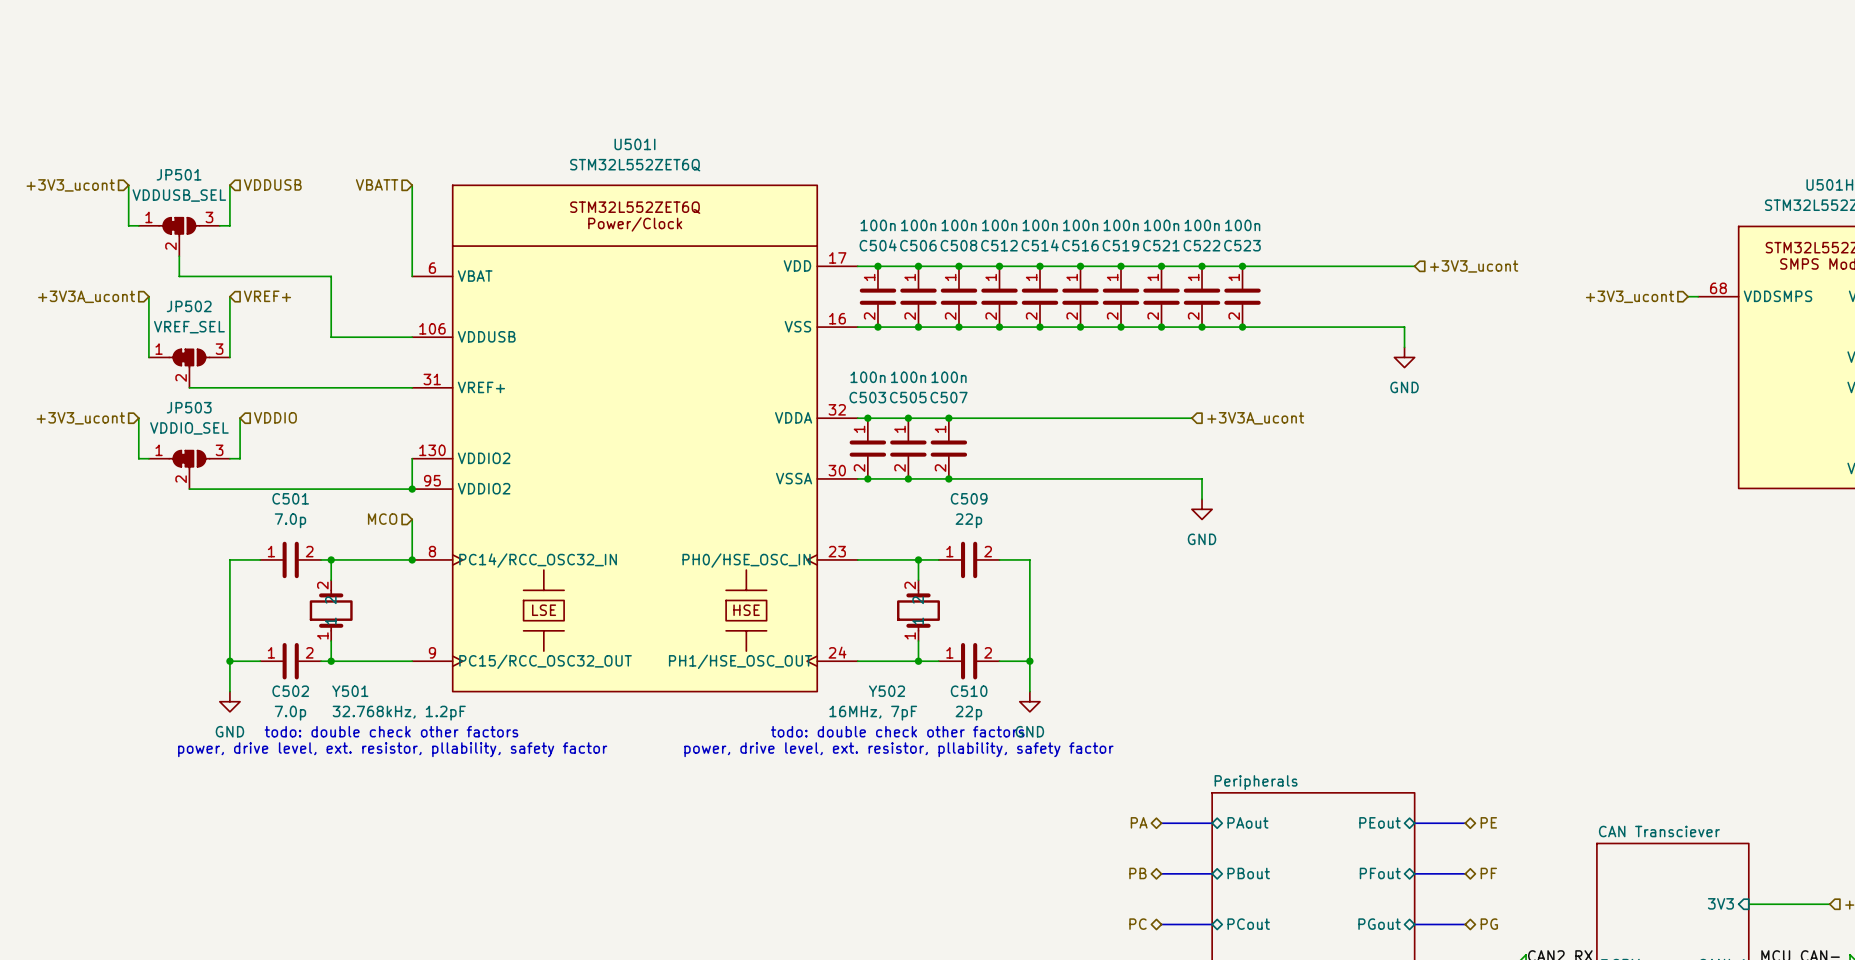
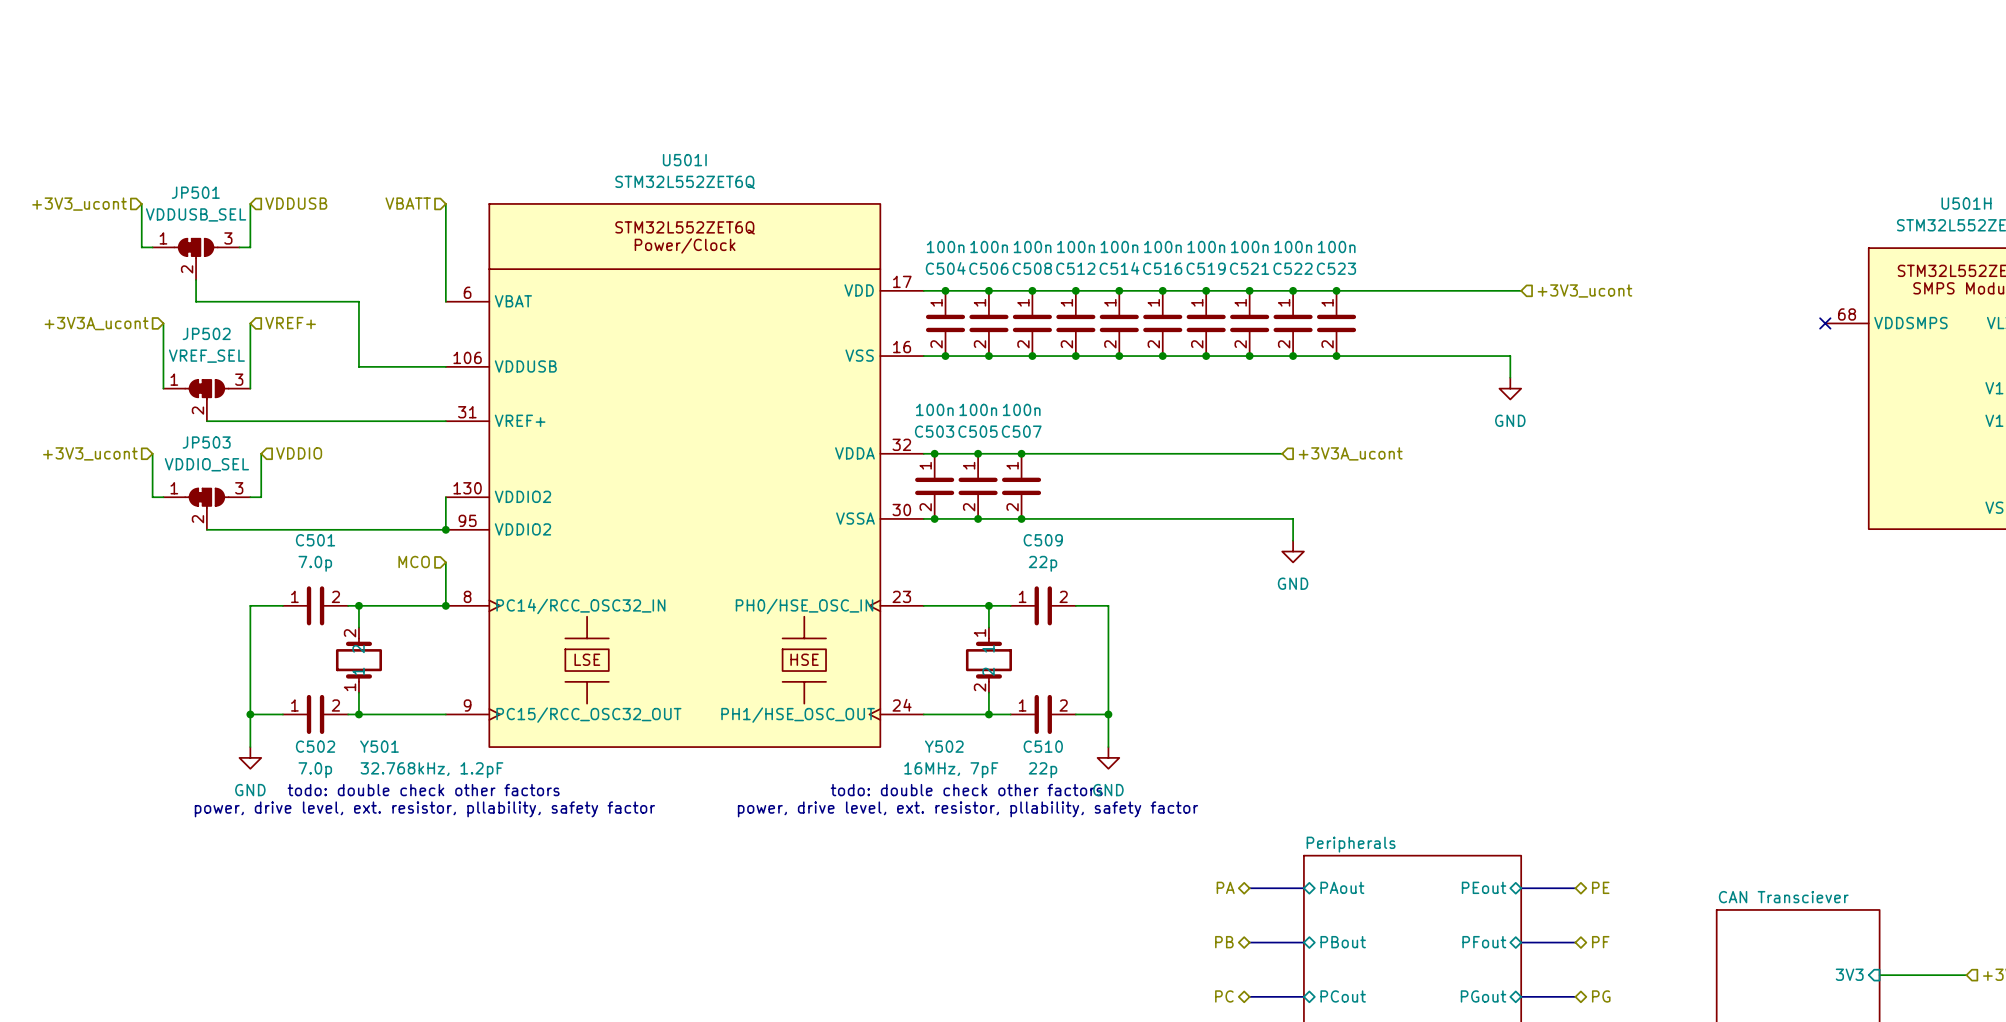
hierarchical label: +3V3_ucont (1630, 296) -> none
wire: (1688, 296) (1698, 296) -> none
no-connect mark: none -> (1825, 323)
Y502 rotation: 0° (918, 610) -> 180° (988, 660)

